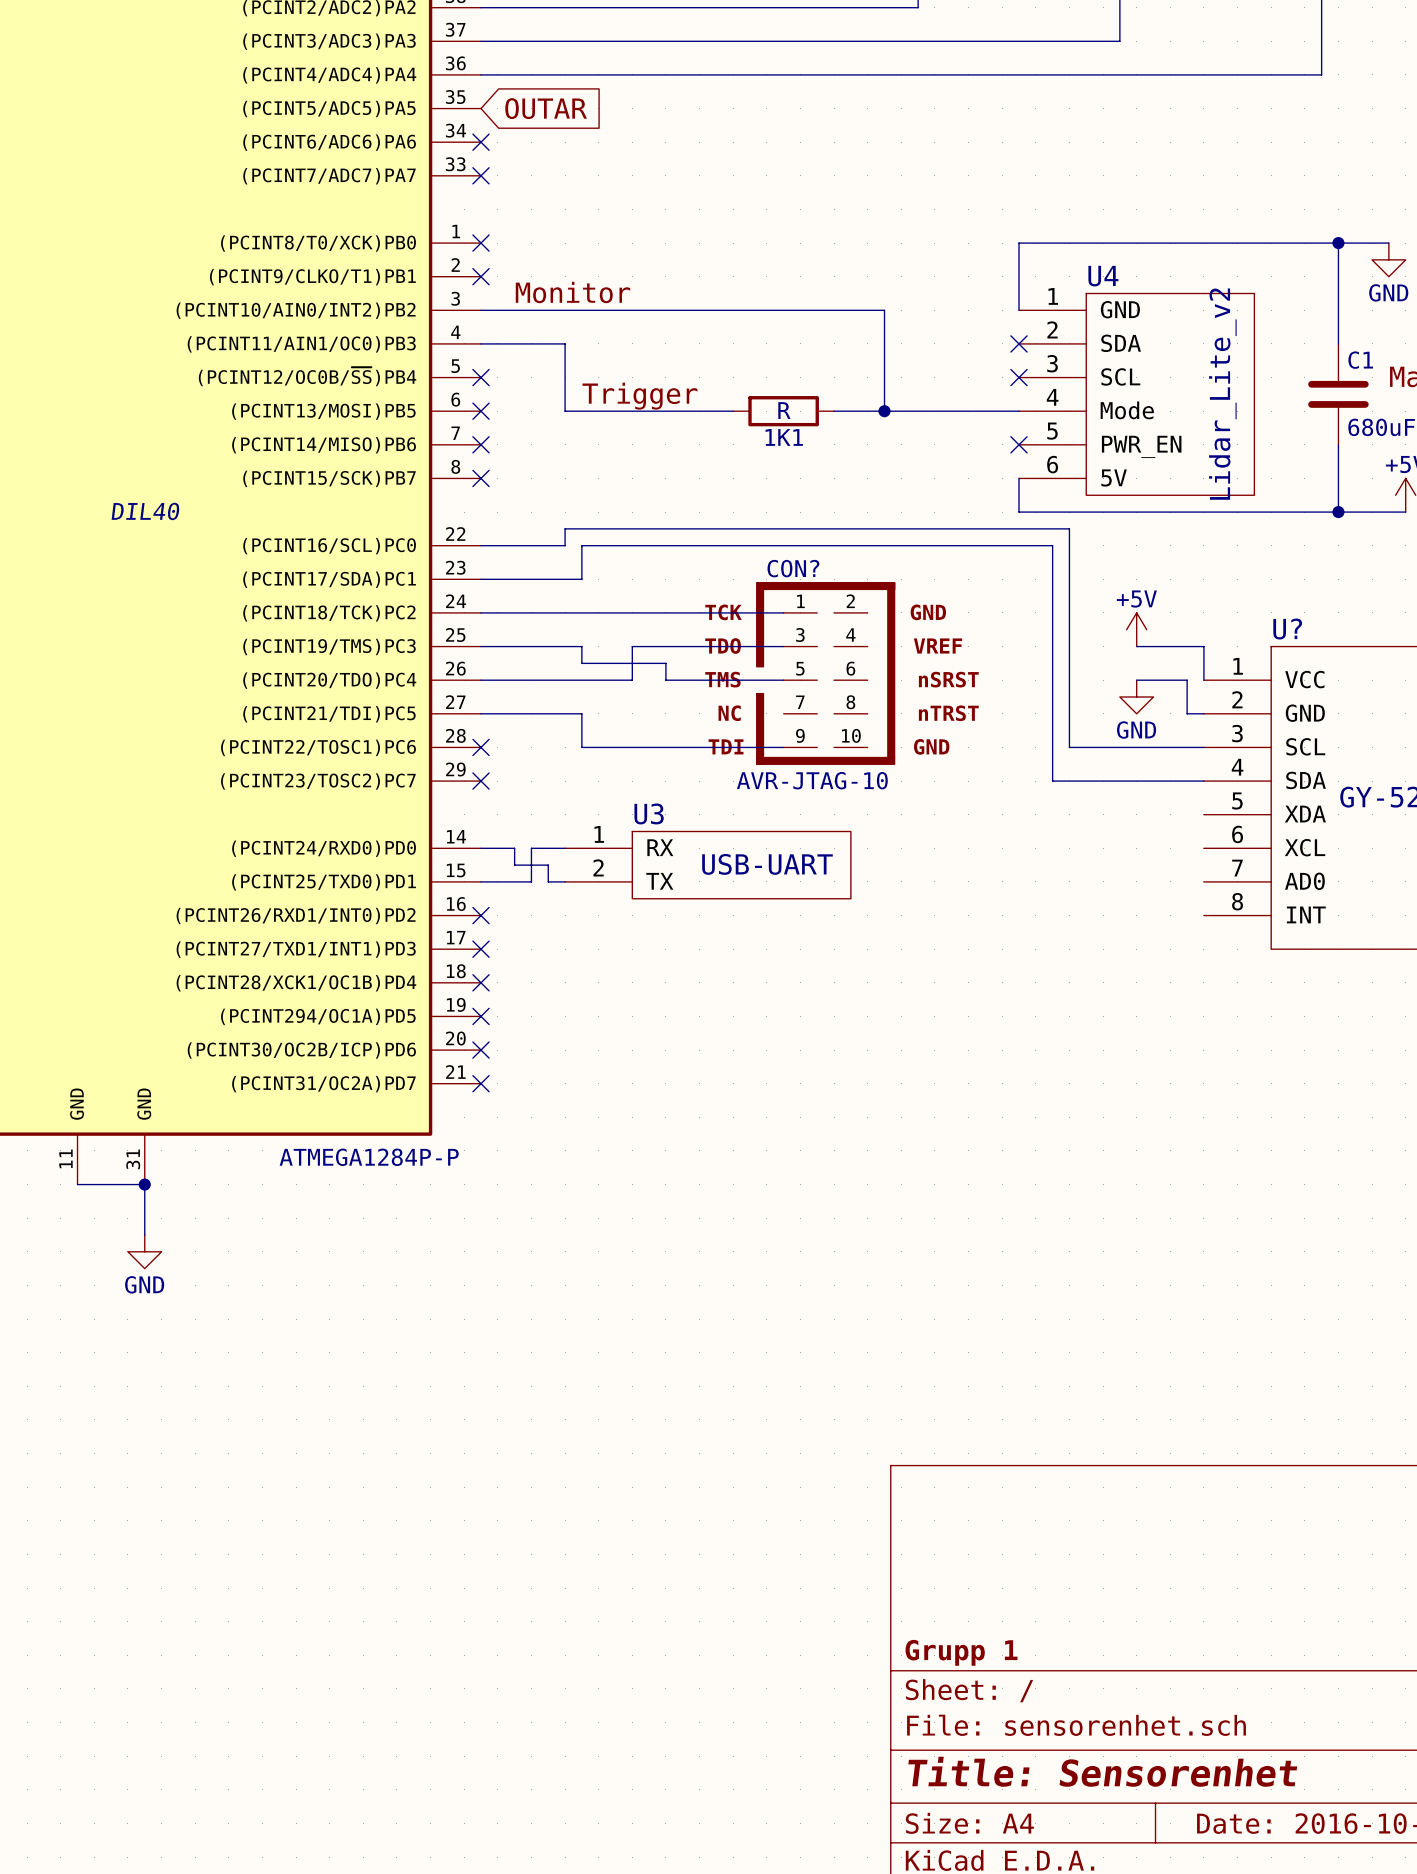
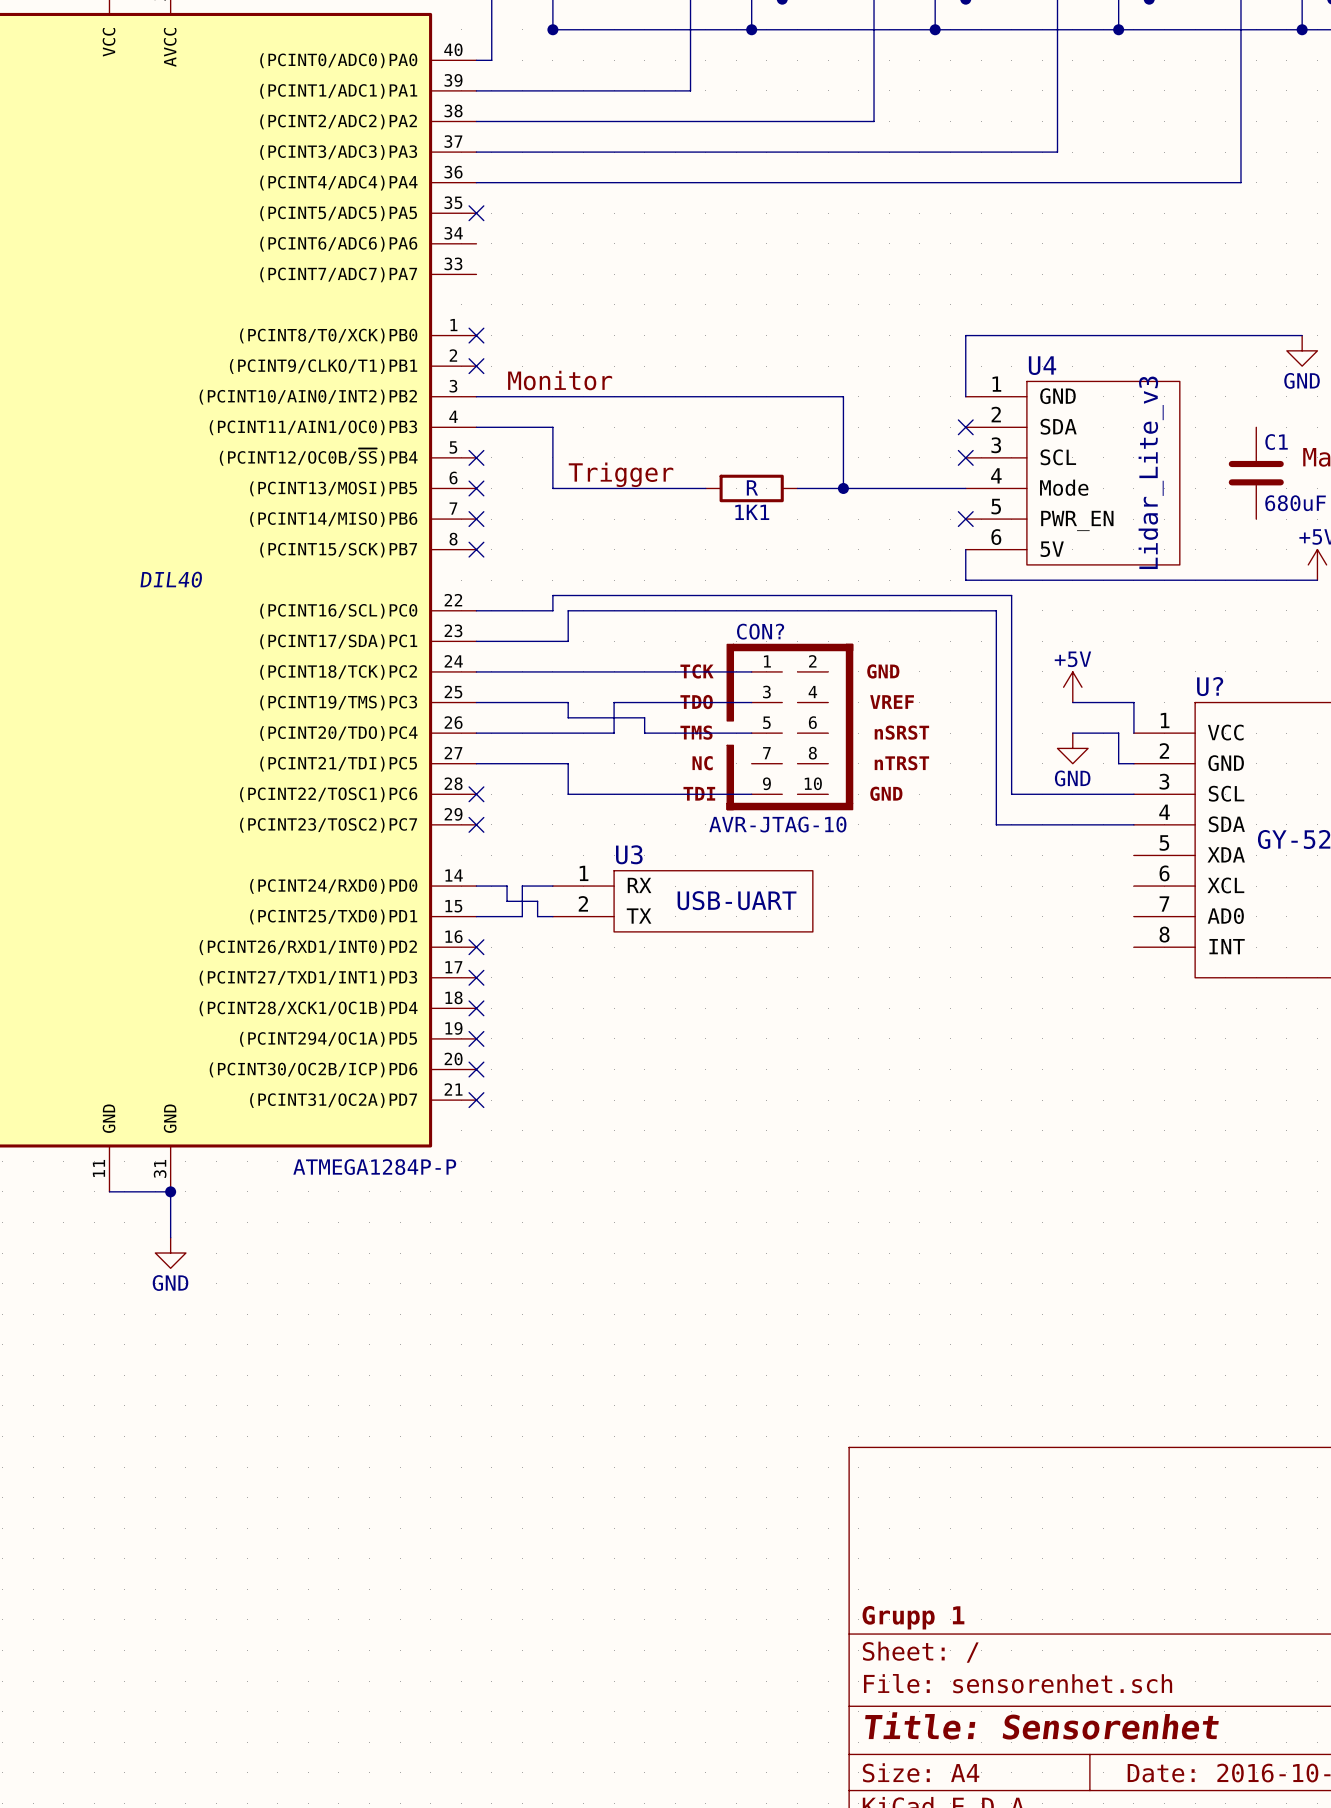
no-connect mark: none -> (476, 213)
global label: OUTAR (546, 108) -> none
no-connect mark: (481, 142) -> none
no-connect mark: (481, 175) -> none
wire: (1338, 243) (1338, 343) -> none
junction: (1338, 243) -> none
U4 value: Lidar_Lite_v2 (1222, 394) -> Lidar_Lite_v3 (1151, 472)
wire: (1338, 444) (1338, 512) -> none
junction: (1338, 512) -> none

